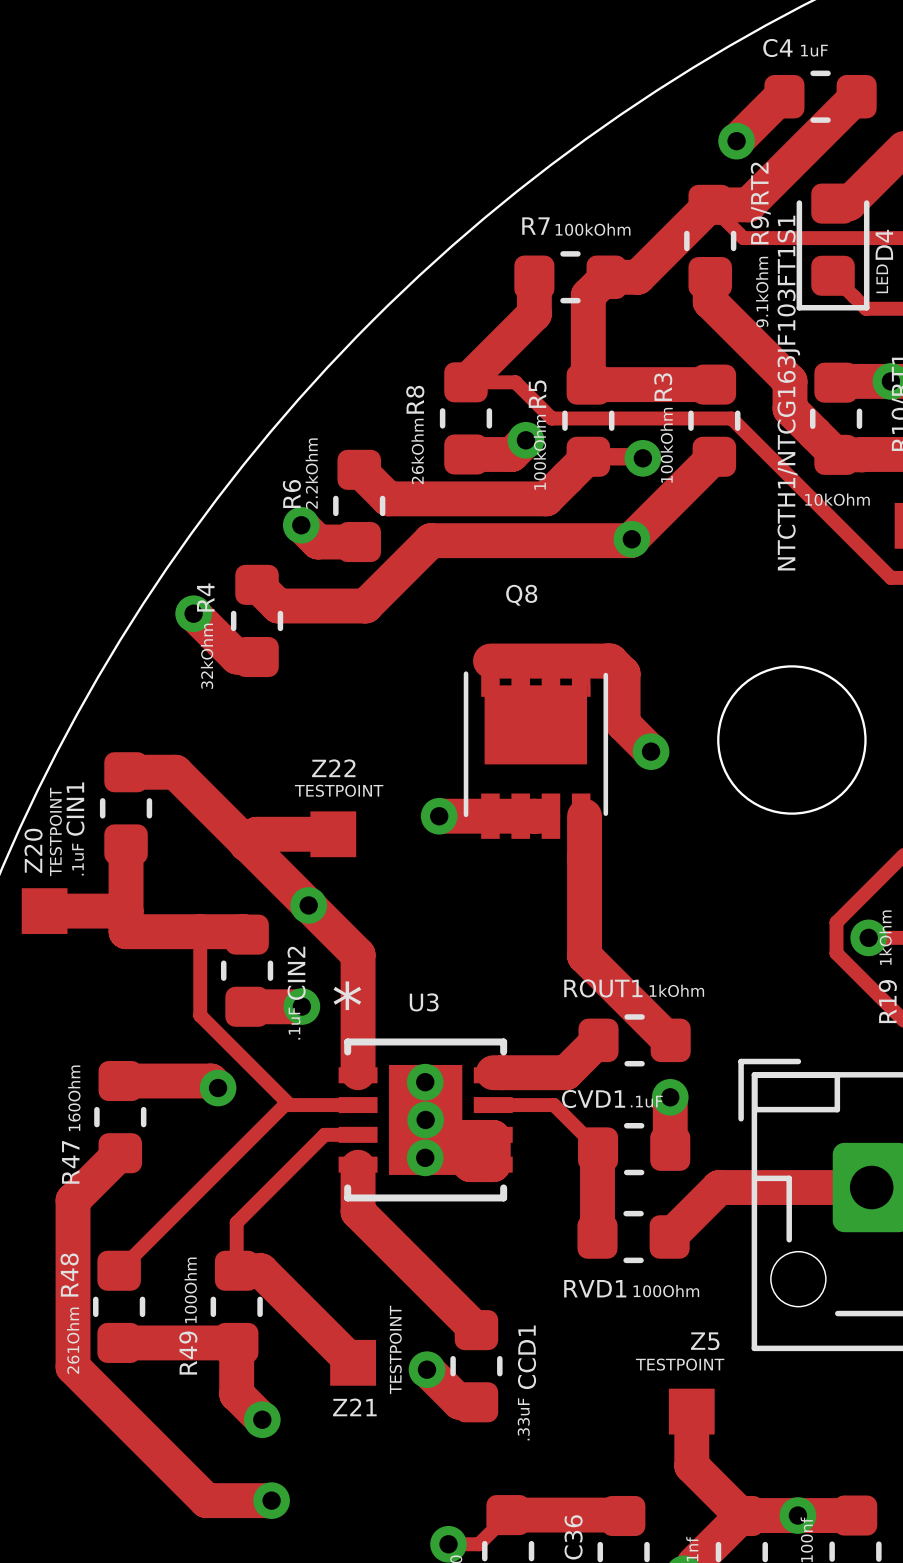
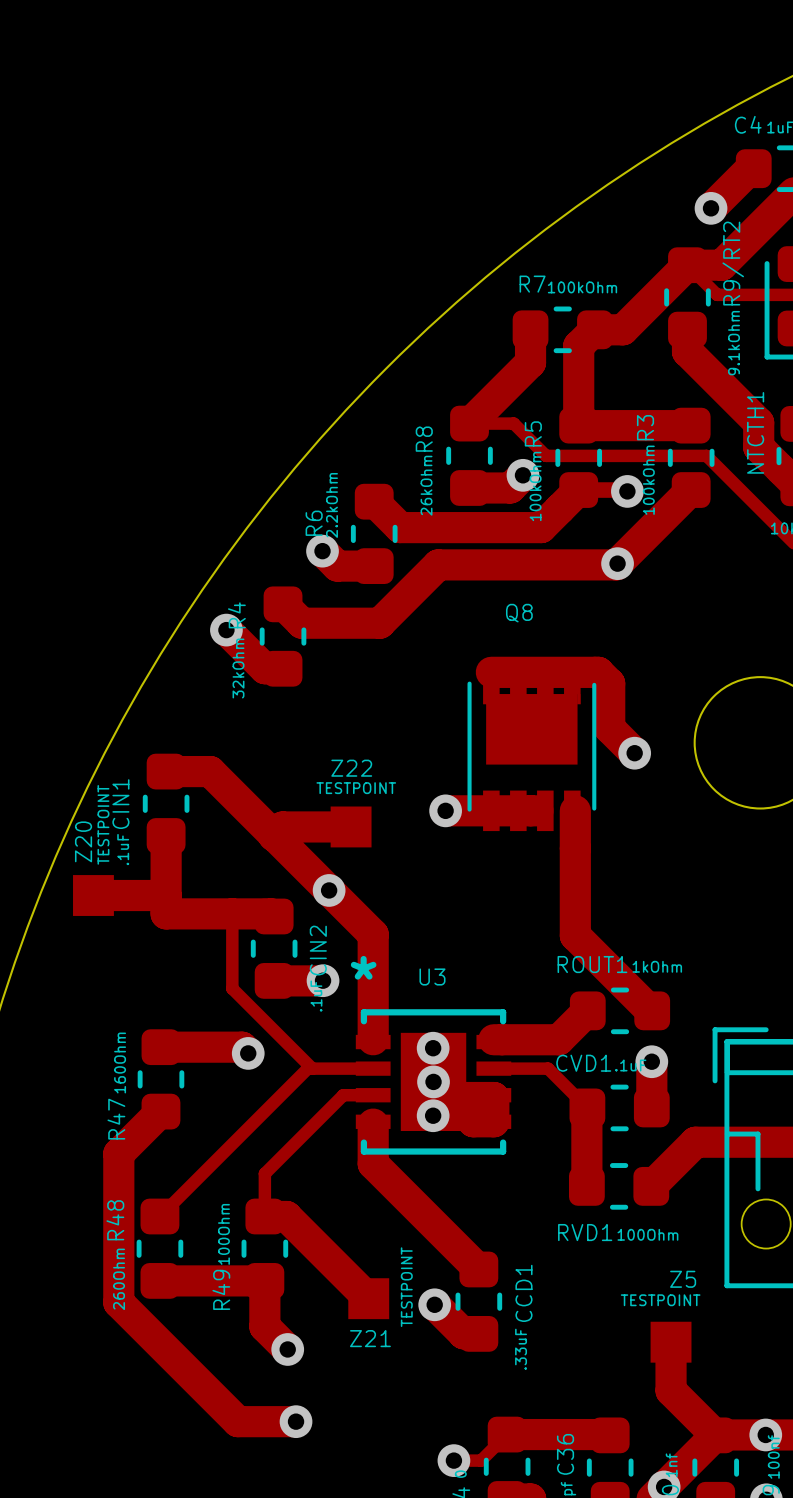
NTCTH1/NTCG163JF103FT1S1 name: NTCTH1/NTCG163JF103FT1S1 (788, 393) -> NTCTH1 (755, 432)
R48 value: 261Ohm (73, 1340) -> 260Ohm (119, 1279)

